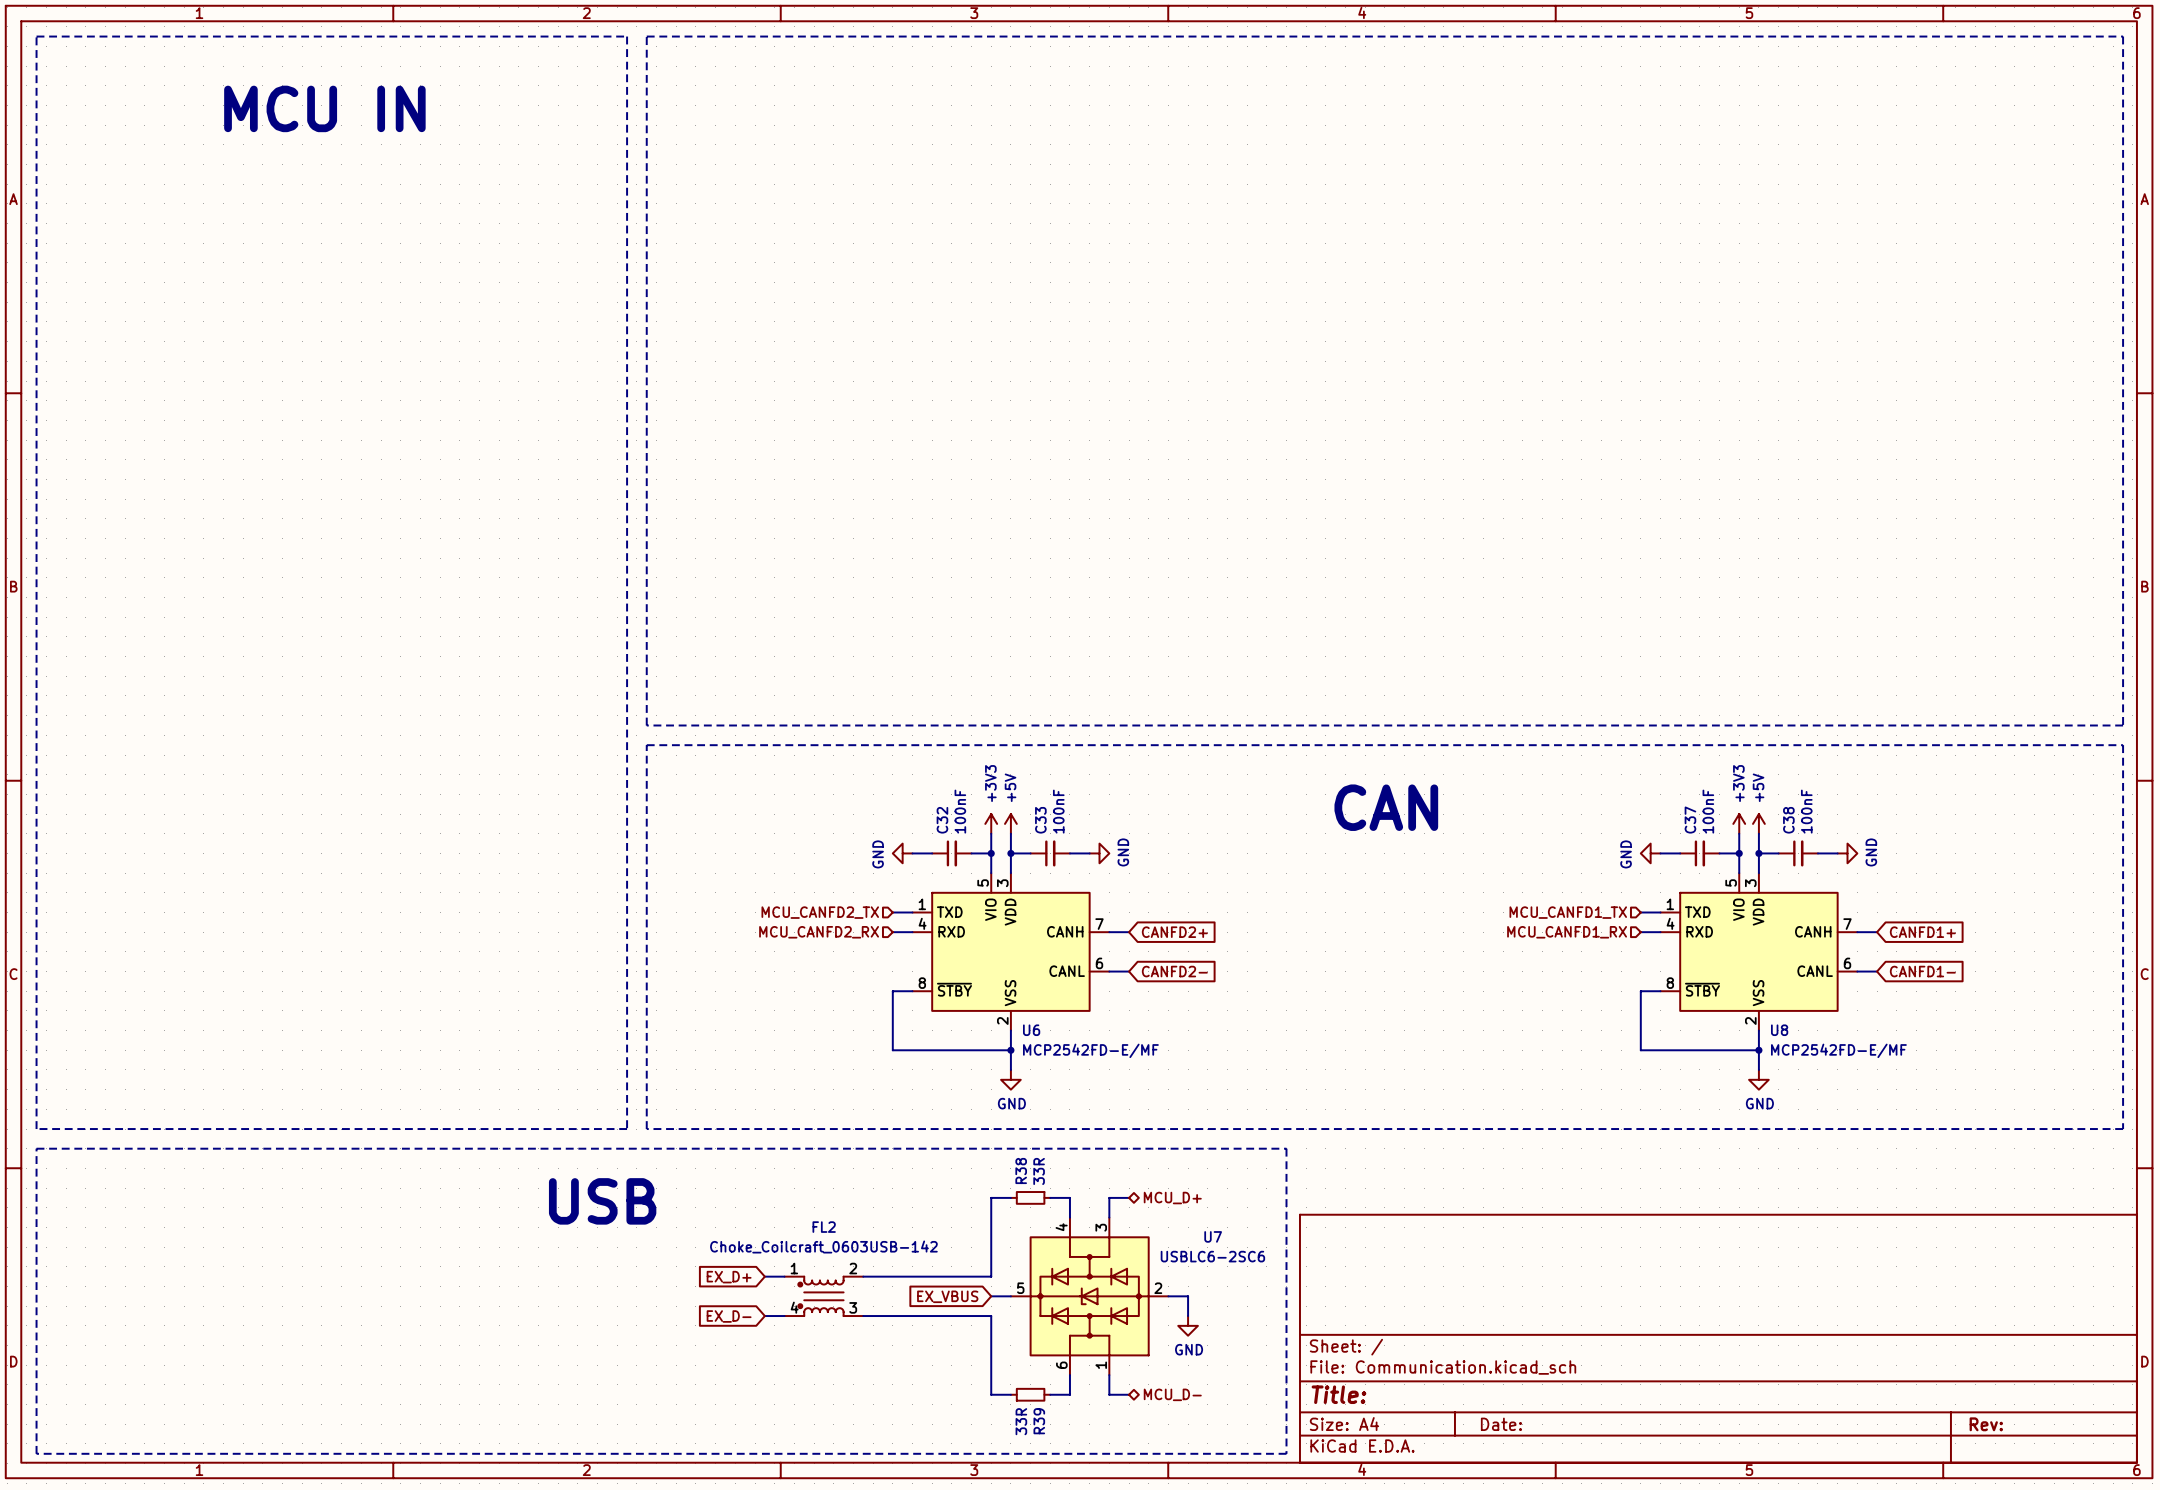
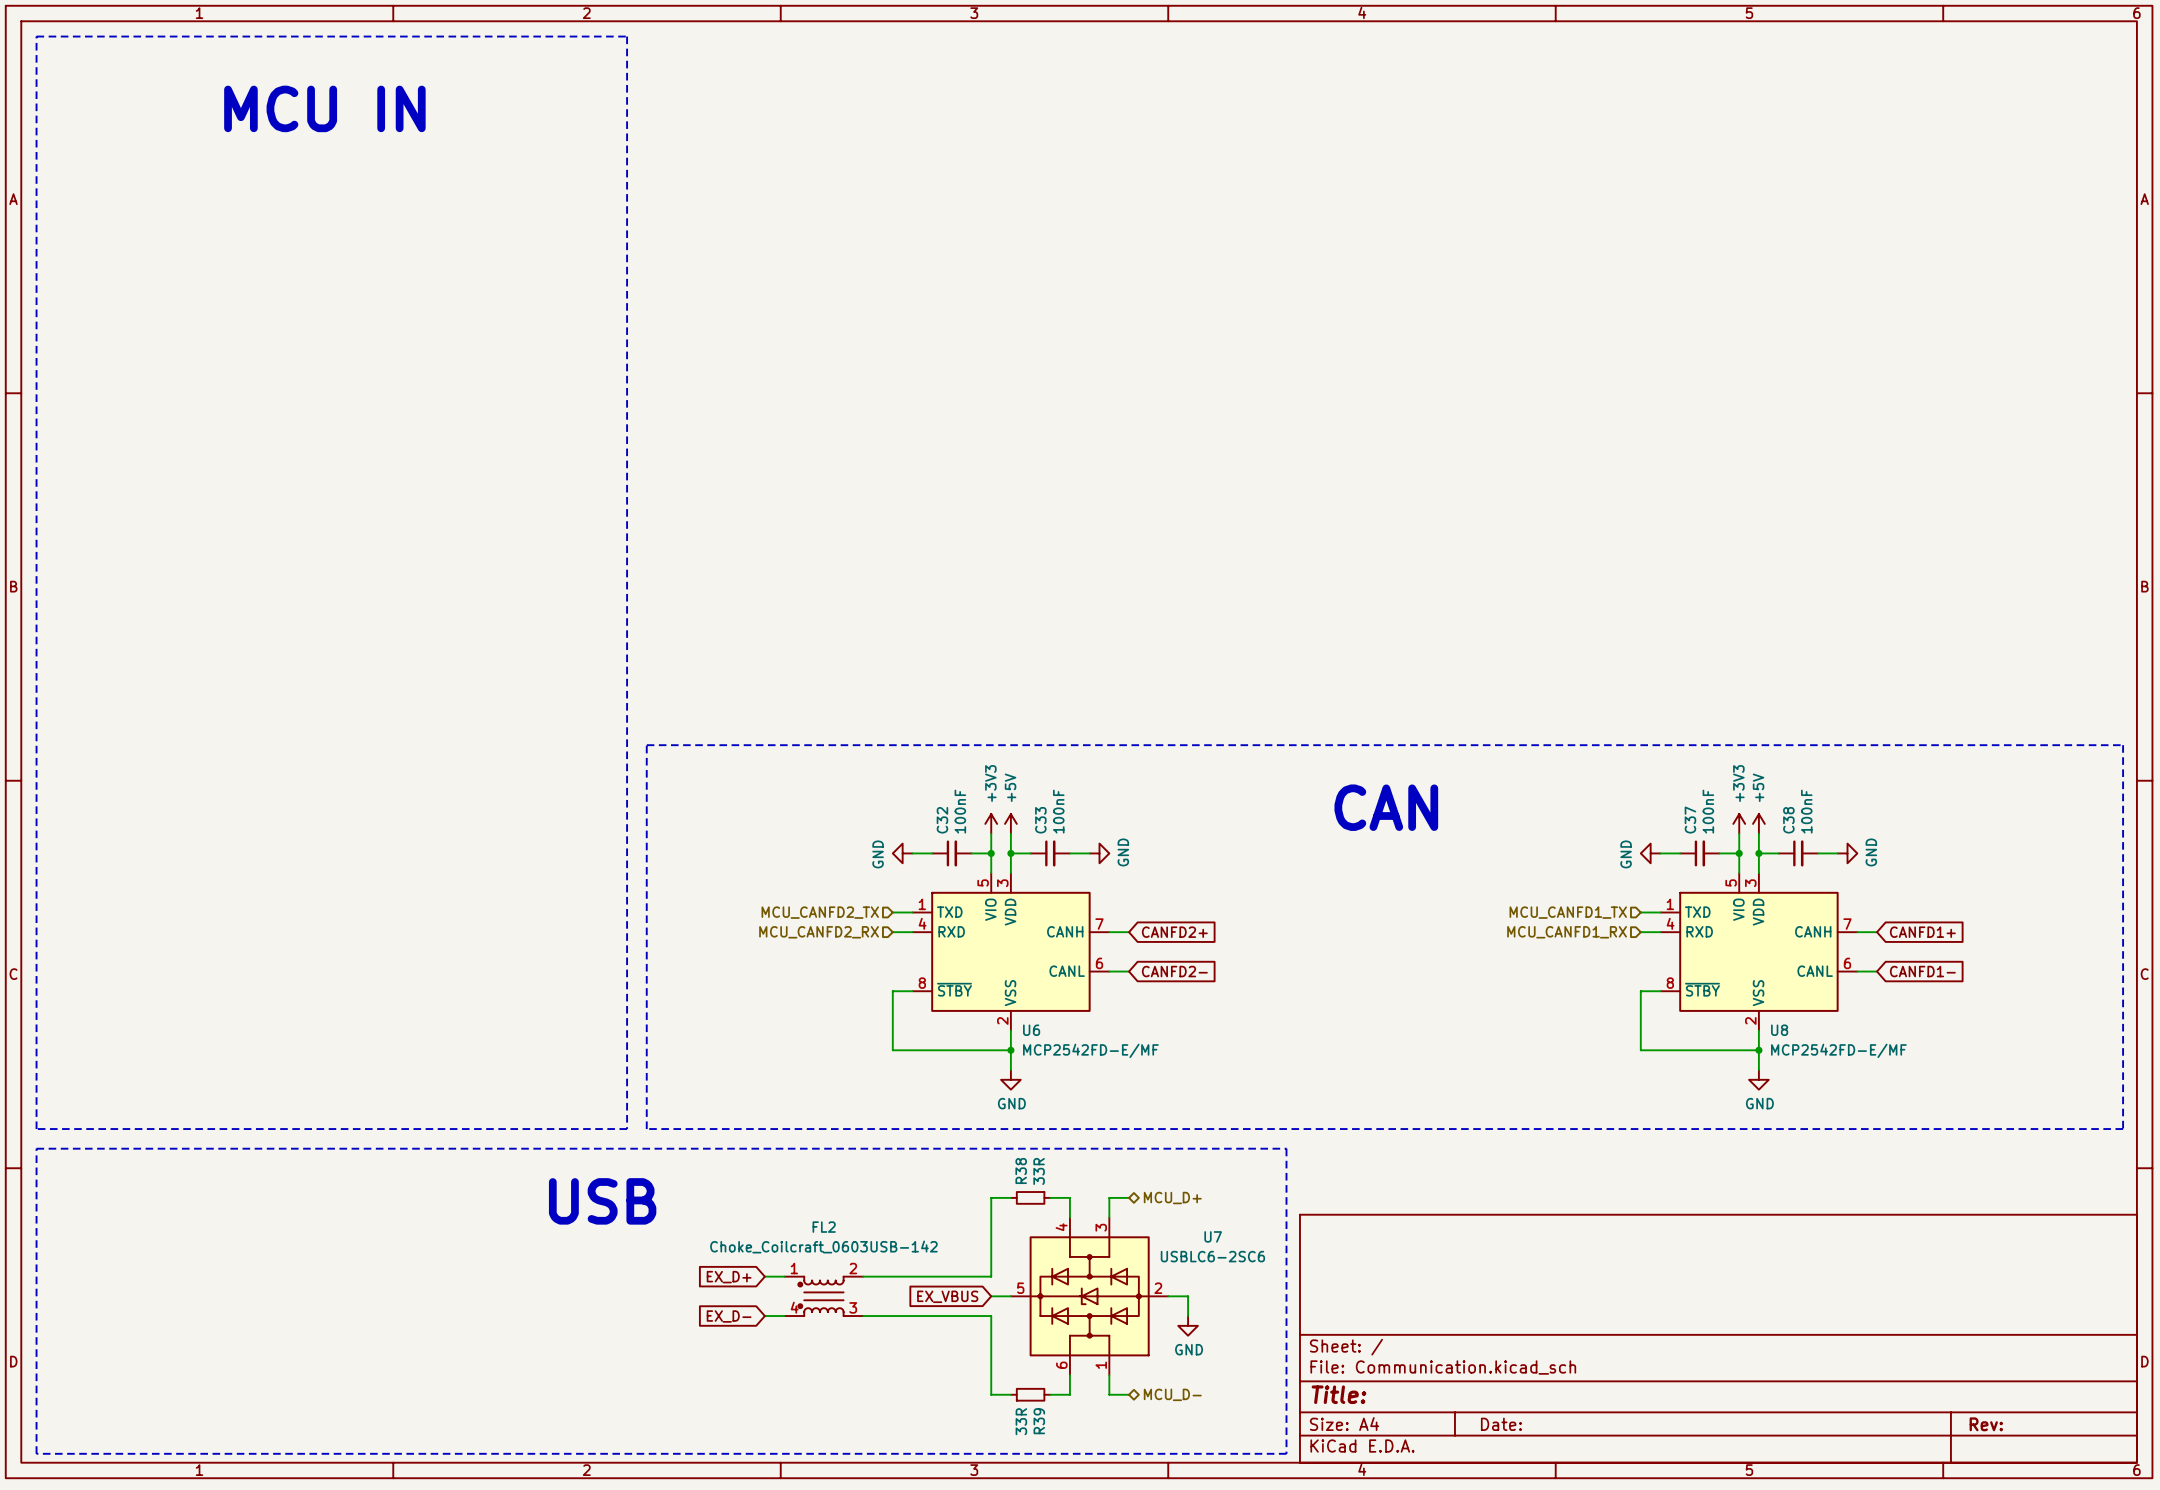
line: (646, 36) (2123, 36) (2123, 725) (646, 725) (646, 36) -> none

